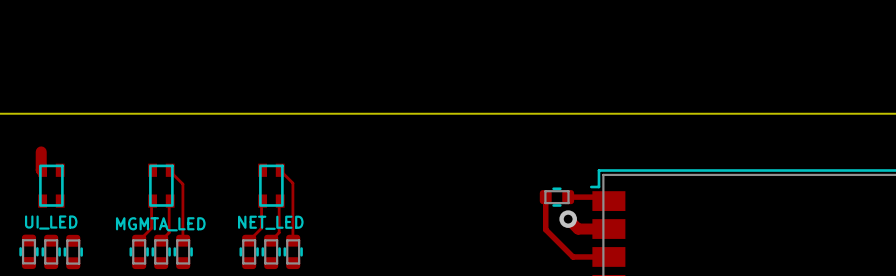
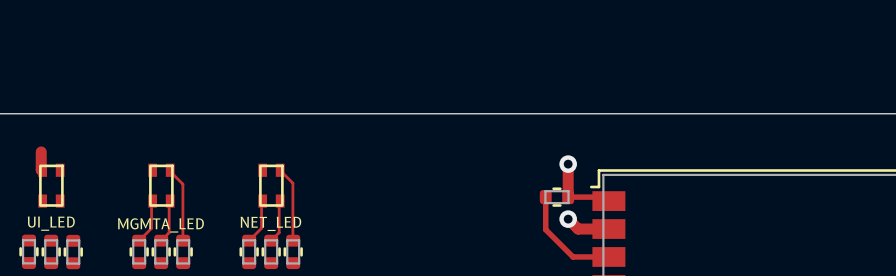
track: none -> (568, 164) (568, 197)
via: none -> (568, 164)

